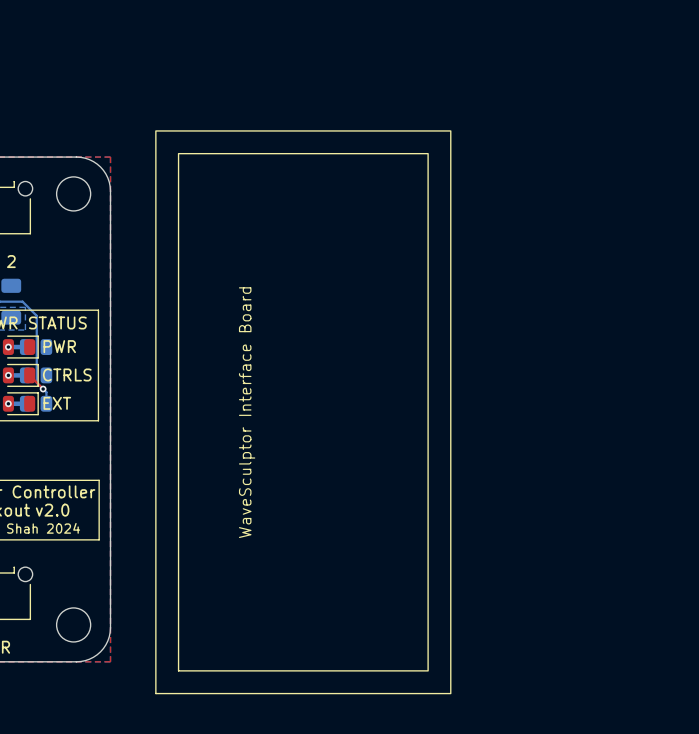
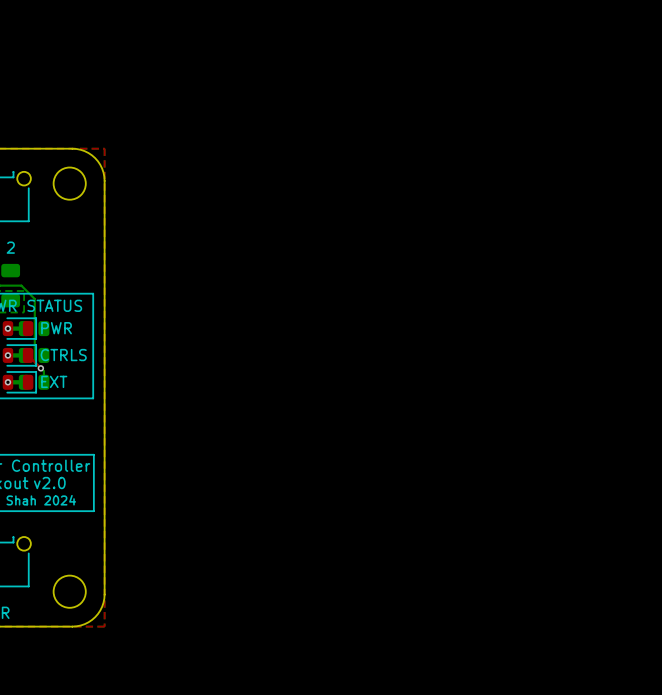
drawing: [155, 130, 452, 695] -> none

